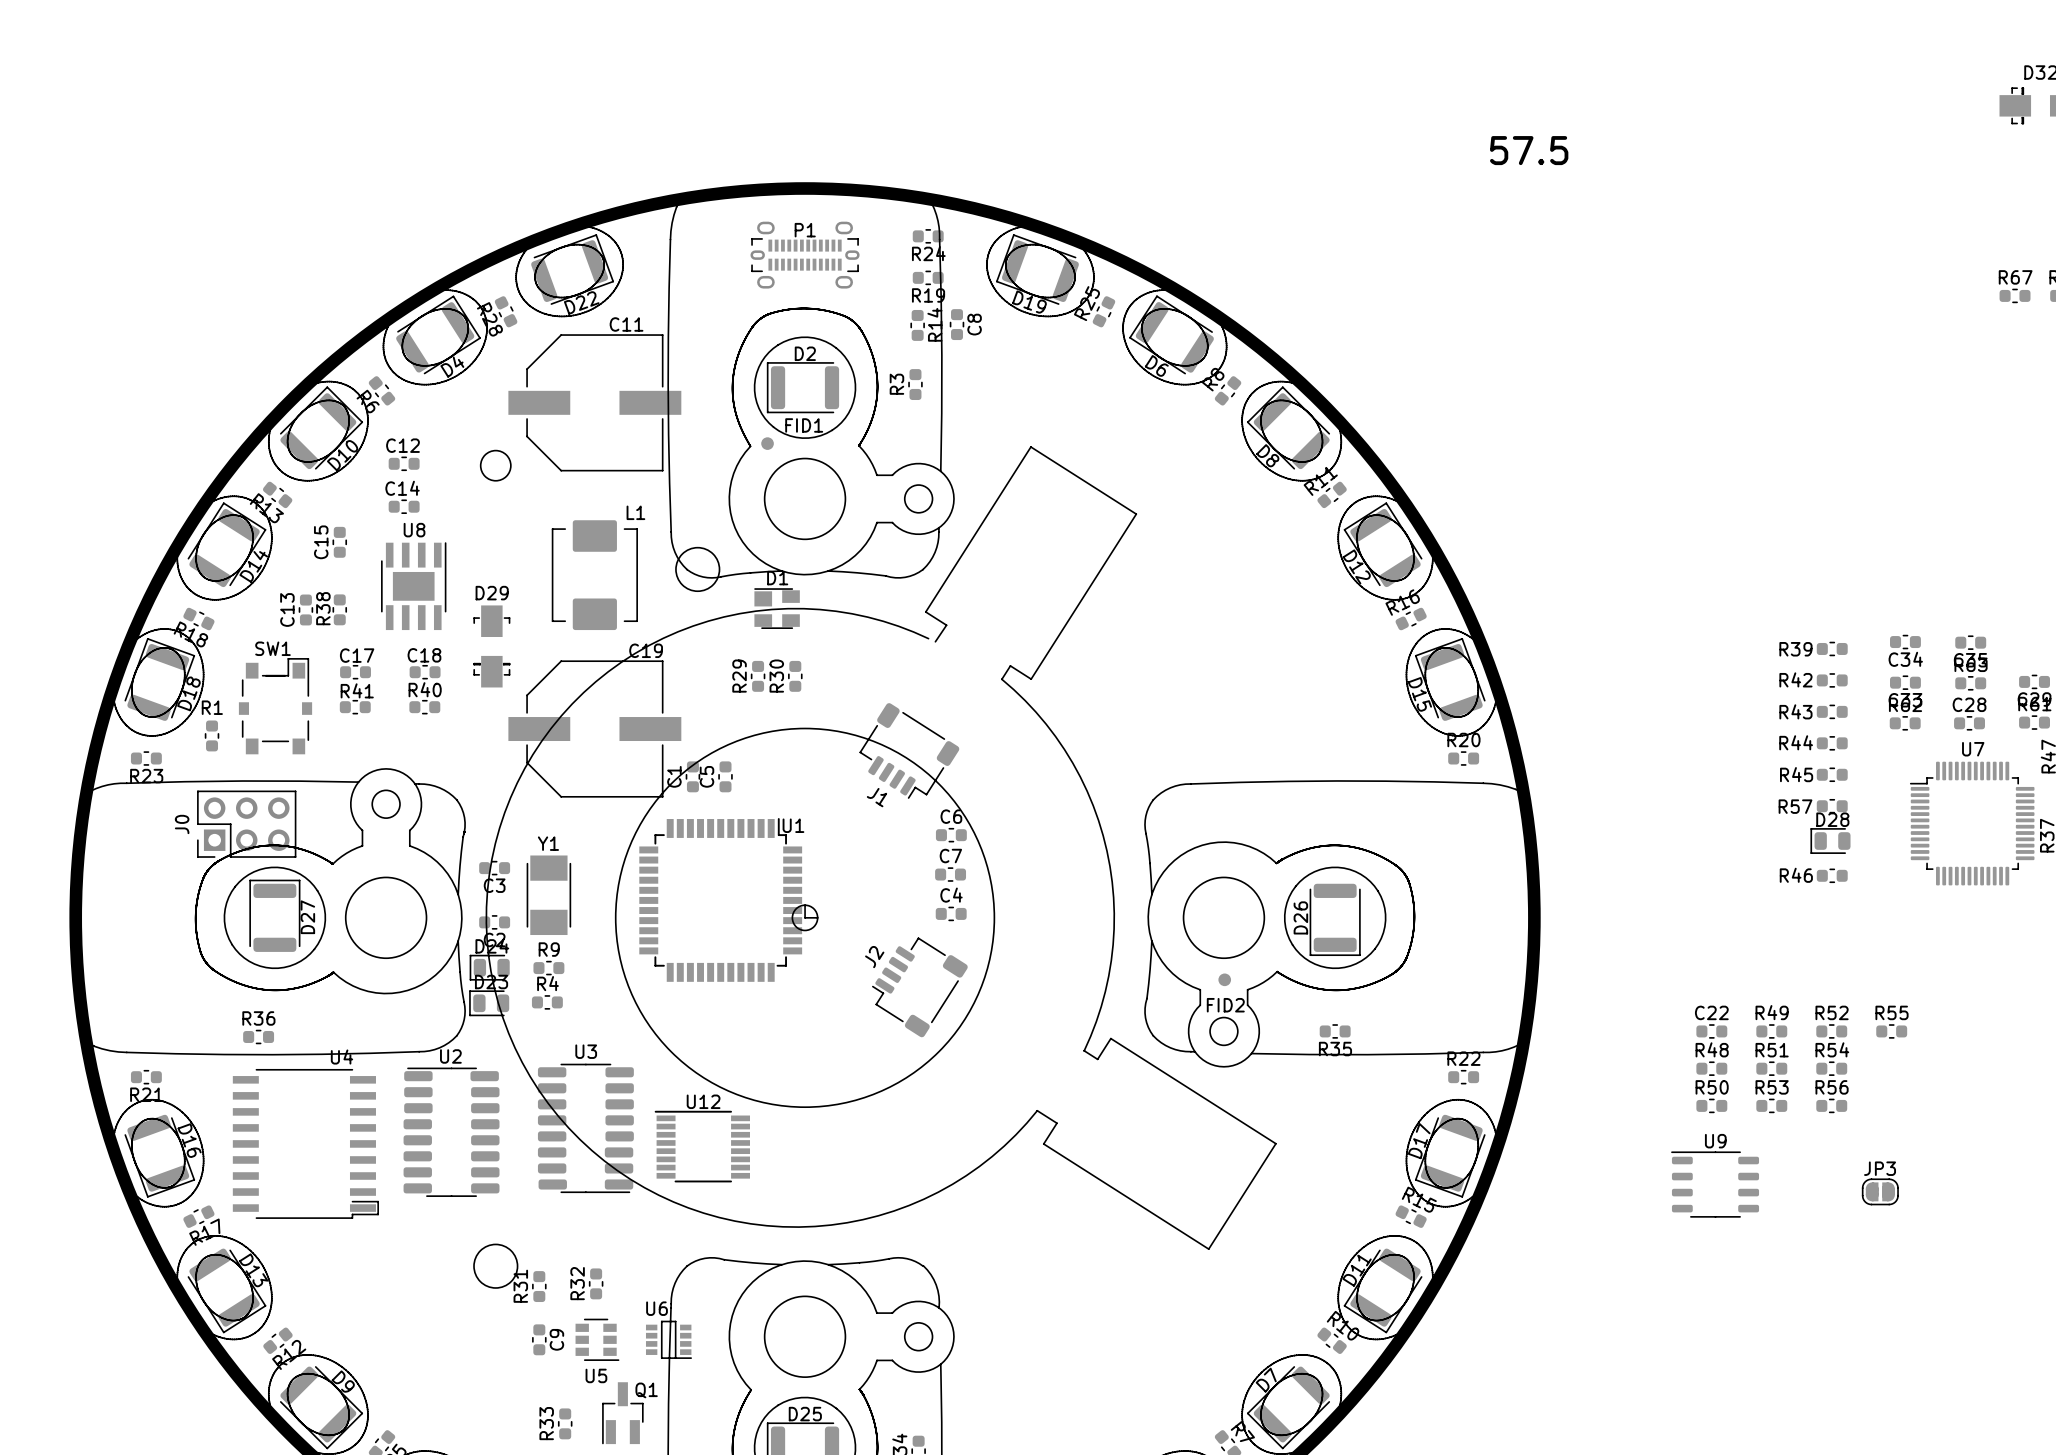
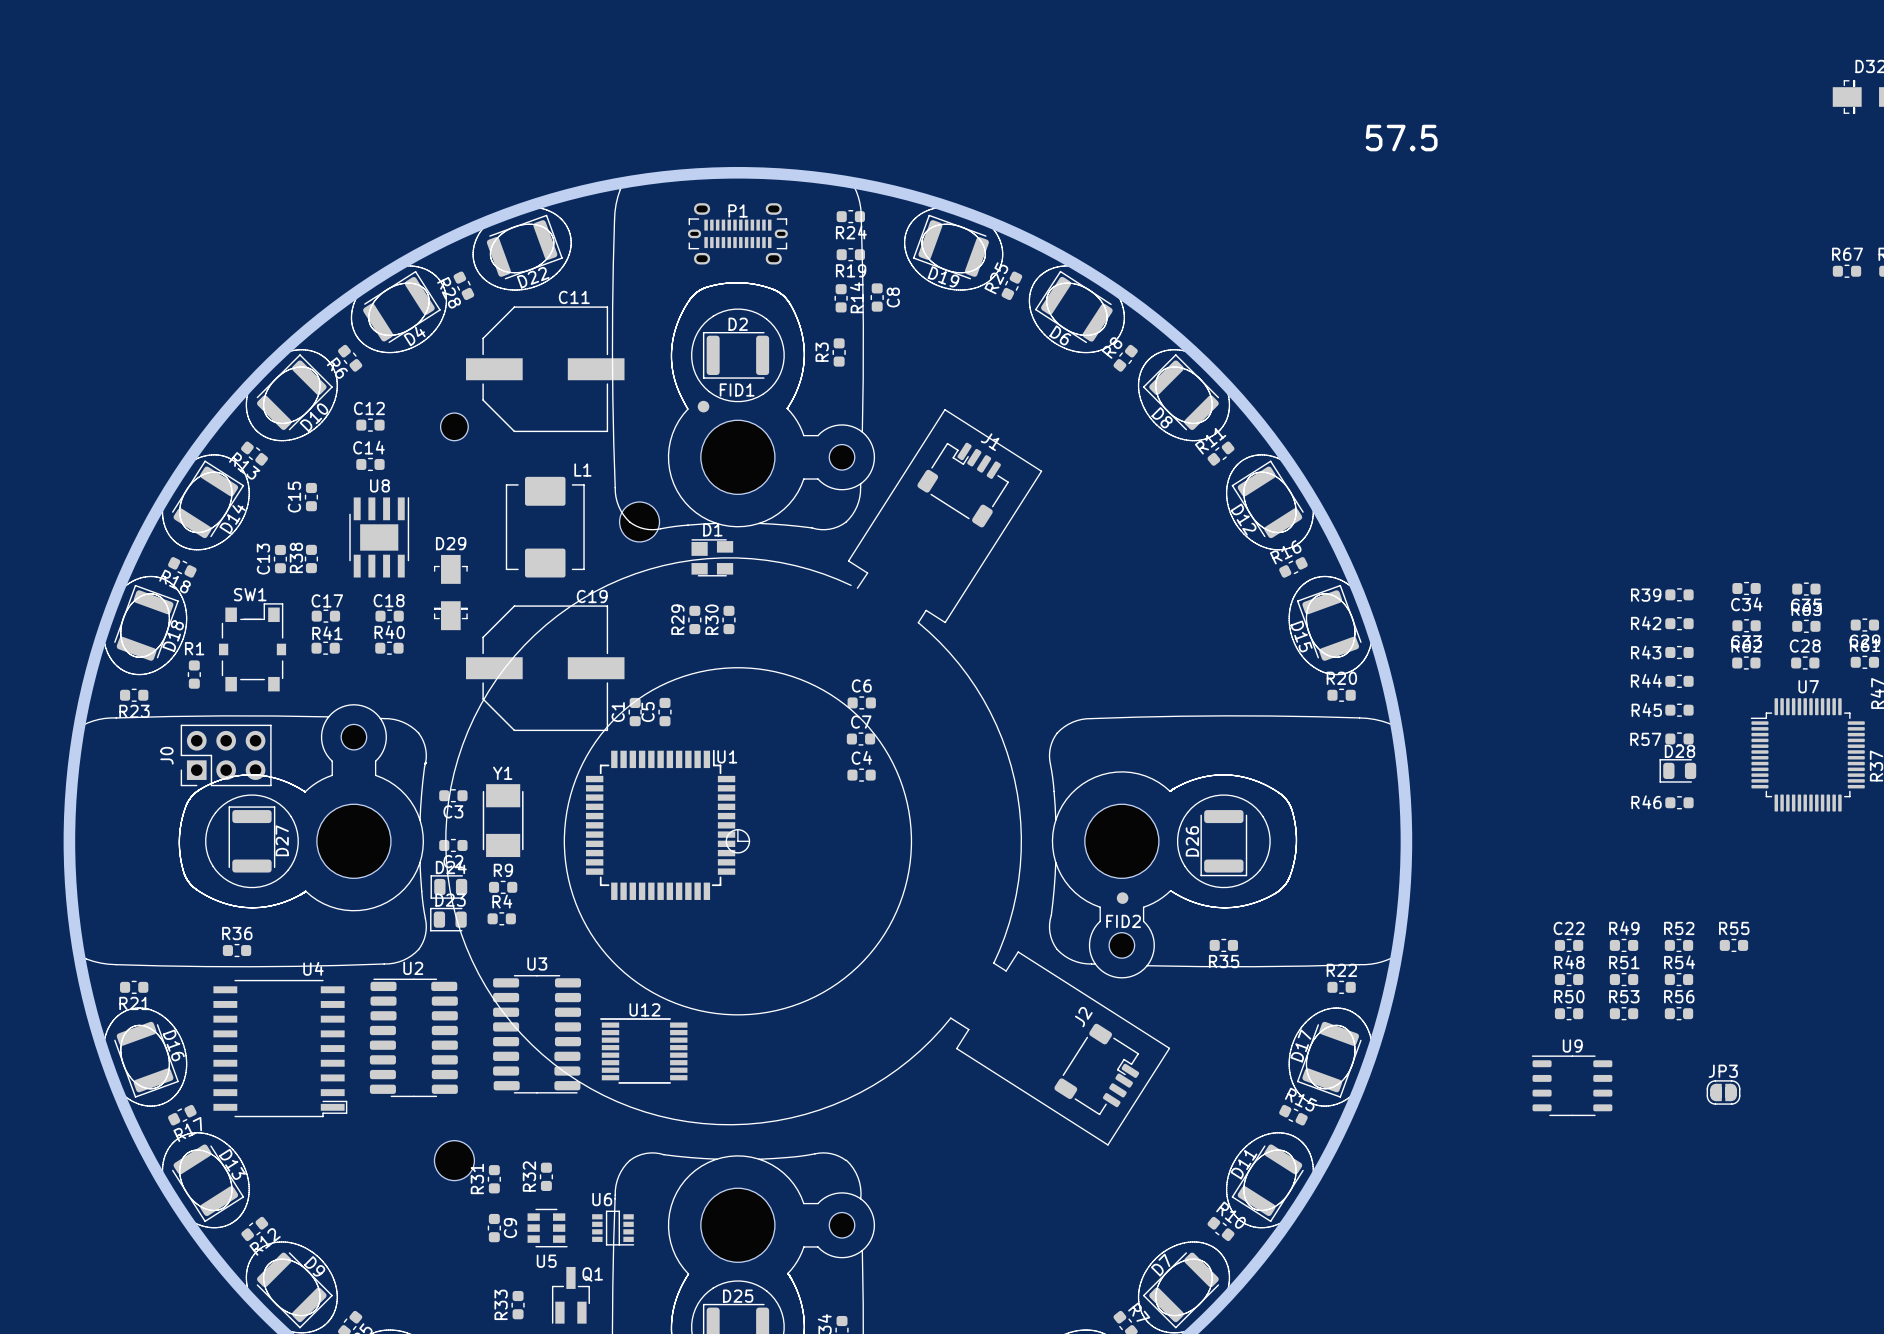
J1 footprint: [859, 703, 960, 799] -> [917, 442, 1009, 528]
J1 name position: J1 (876, 797) -> J1 (990, 442)
C6 position: (951, 835) -> (861, 702)
C7 position: (950, 874) -> (860, 739)
C4 position: (951, 913) -> (861, 775)
J2 footprint: [872, 937, 968, 1038] -> [1054, 1023, 1140, 1116]
J2 name position: J2 (874, 957) -> J2 (1083, 1017)

